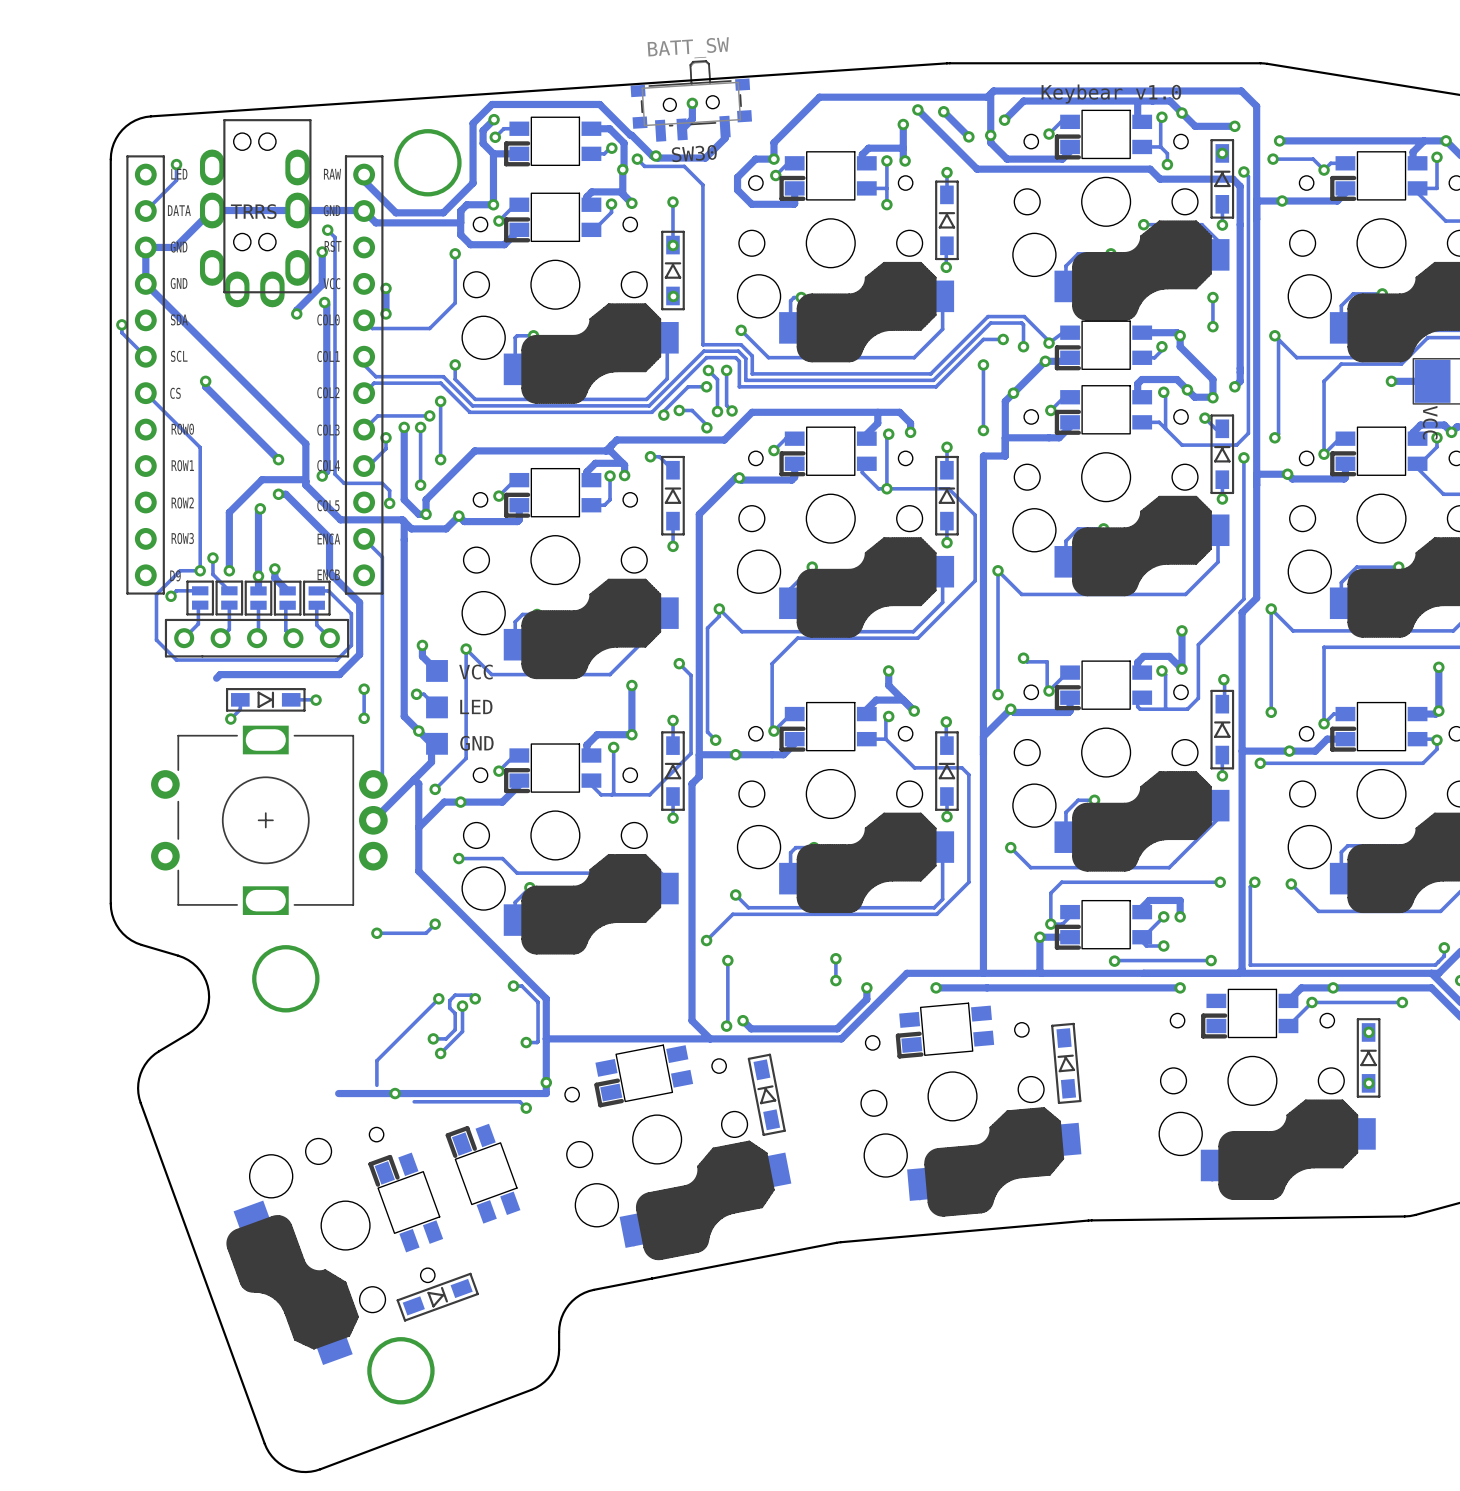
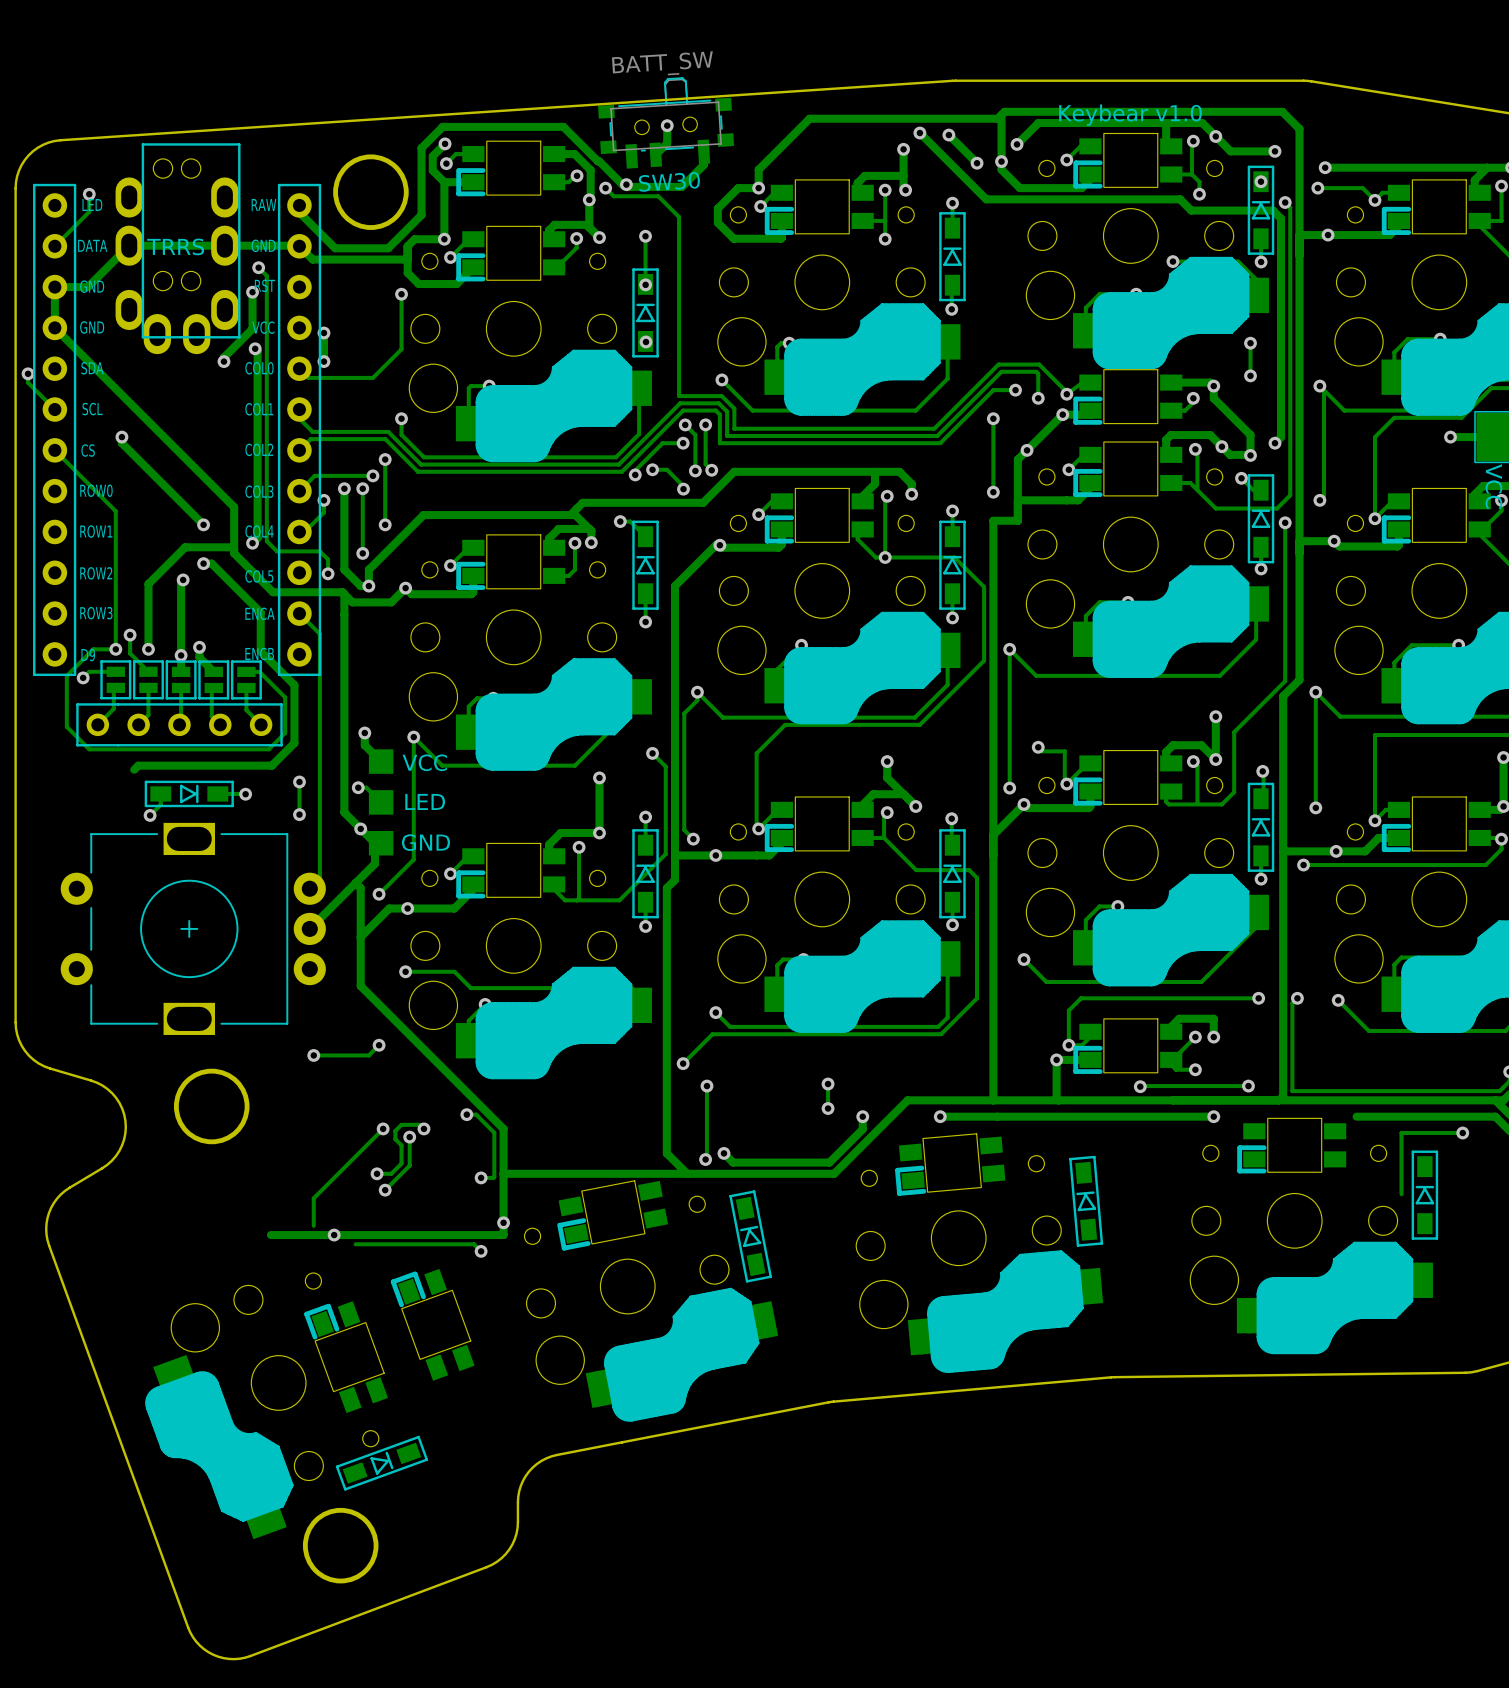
track: (1307, 987) (1301, 987) (1288, 1000) -> none
via: (1333, 987) -> none
via: (1312, 1002) -> none
track: (1347, 1002) (1312, 1002) (1288, 1026) -> (1401, 1133) (1401, 1194)
via: (1368, 1032) -> none
via: (1368, 1083) -> none

